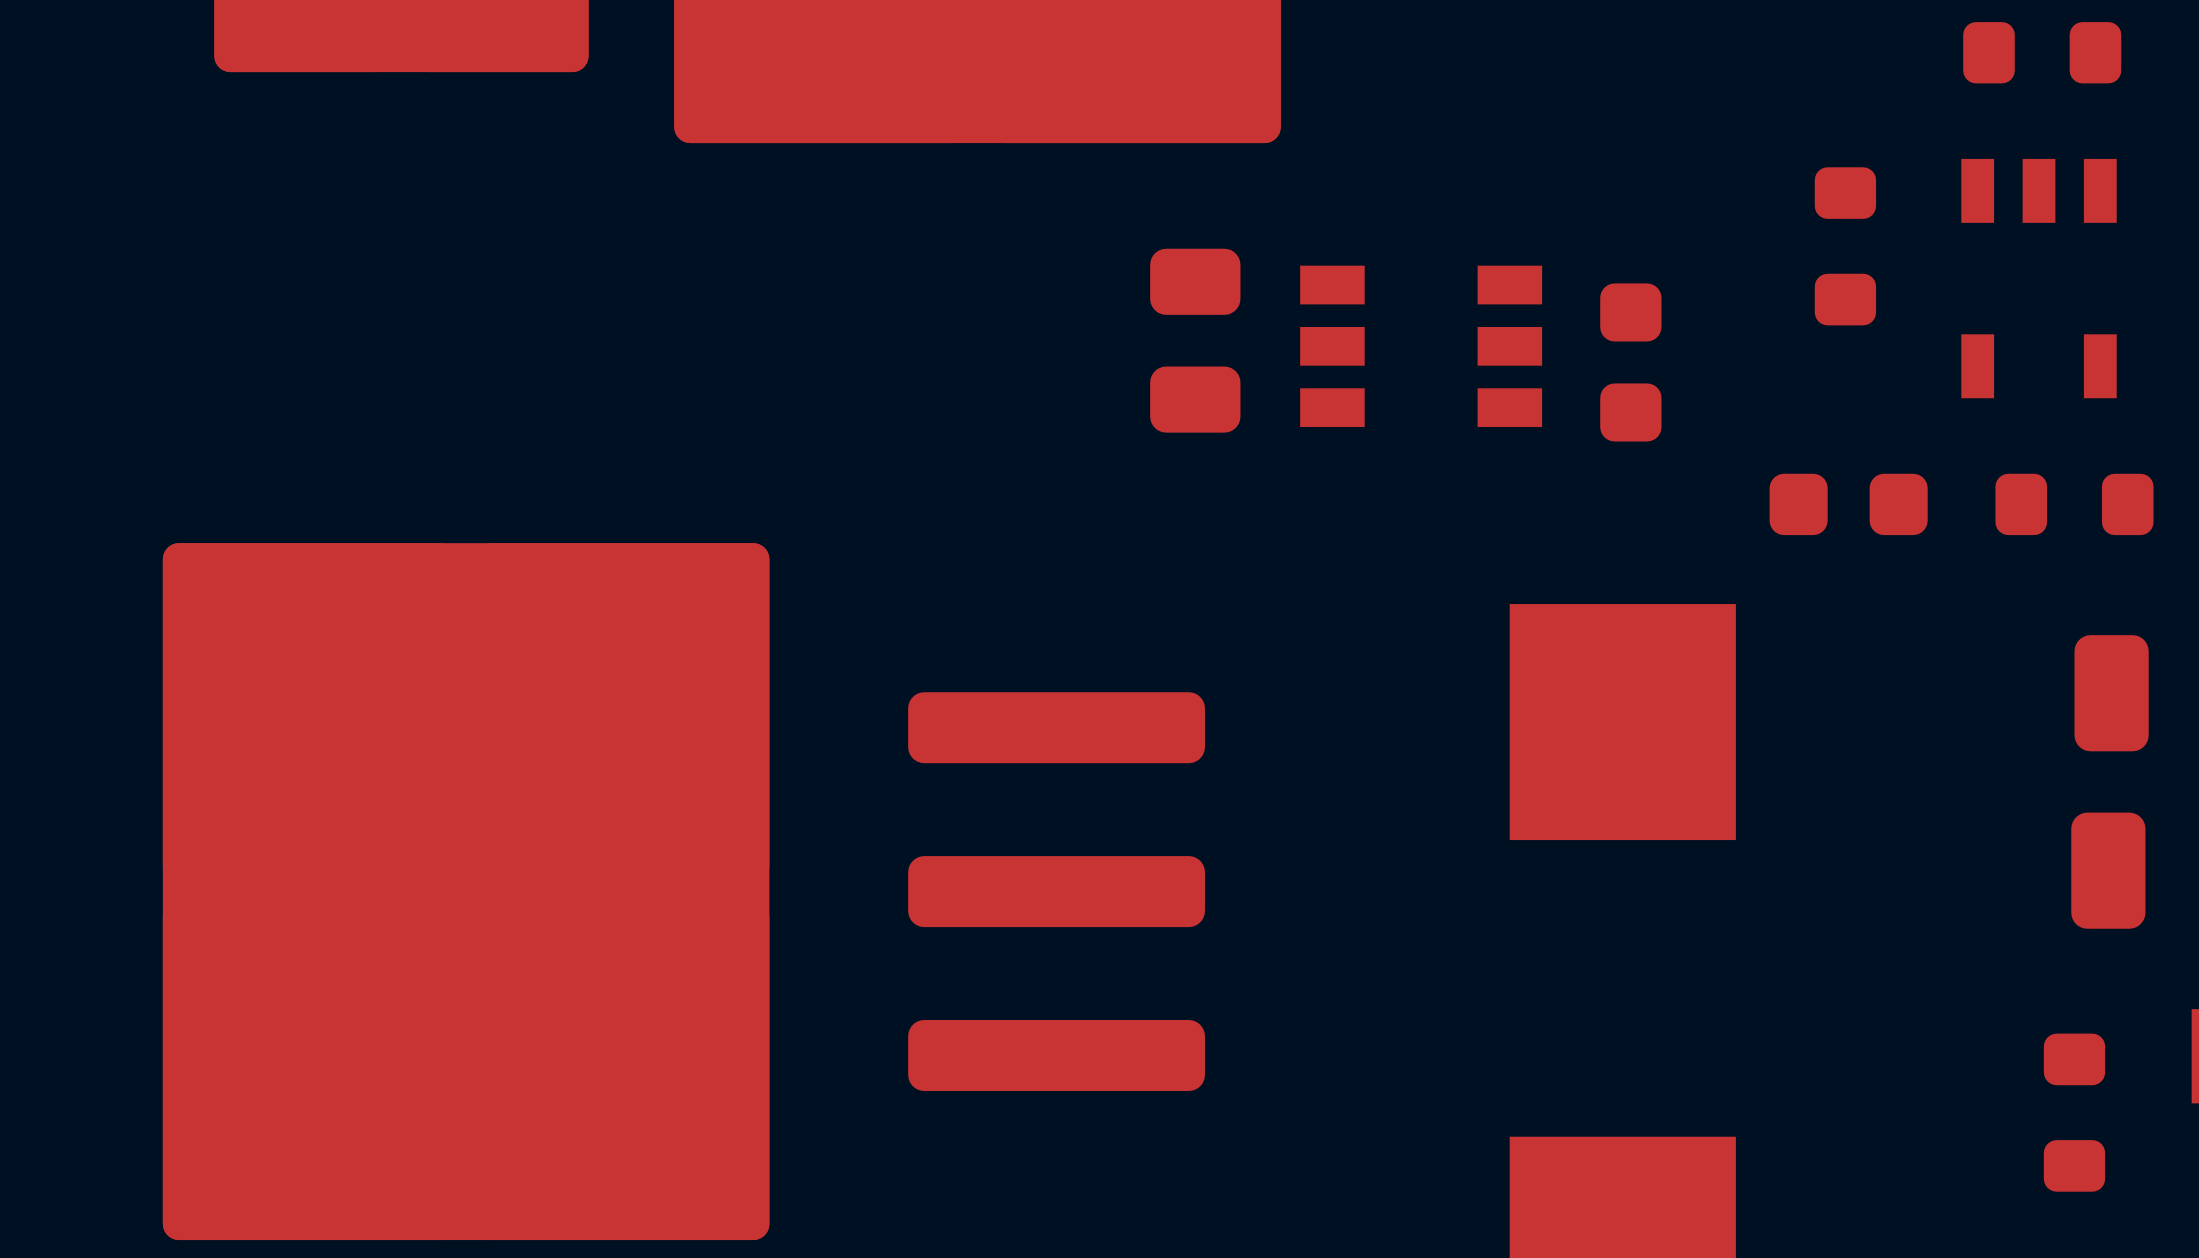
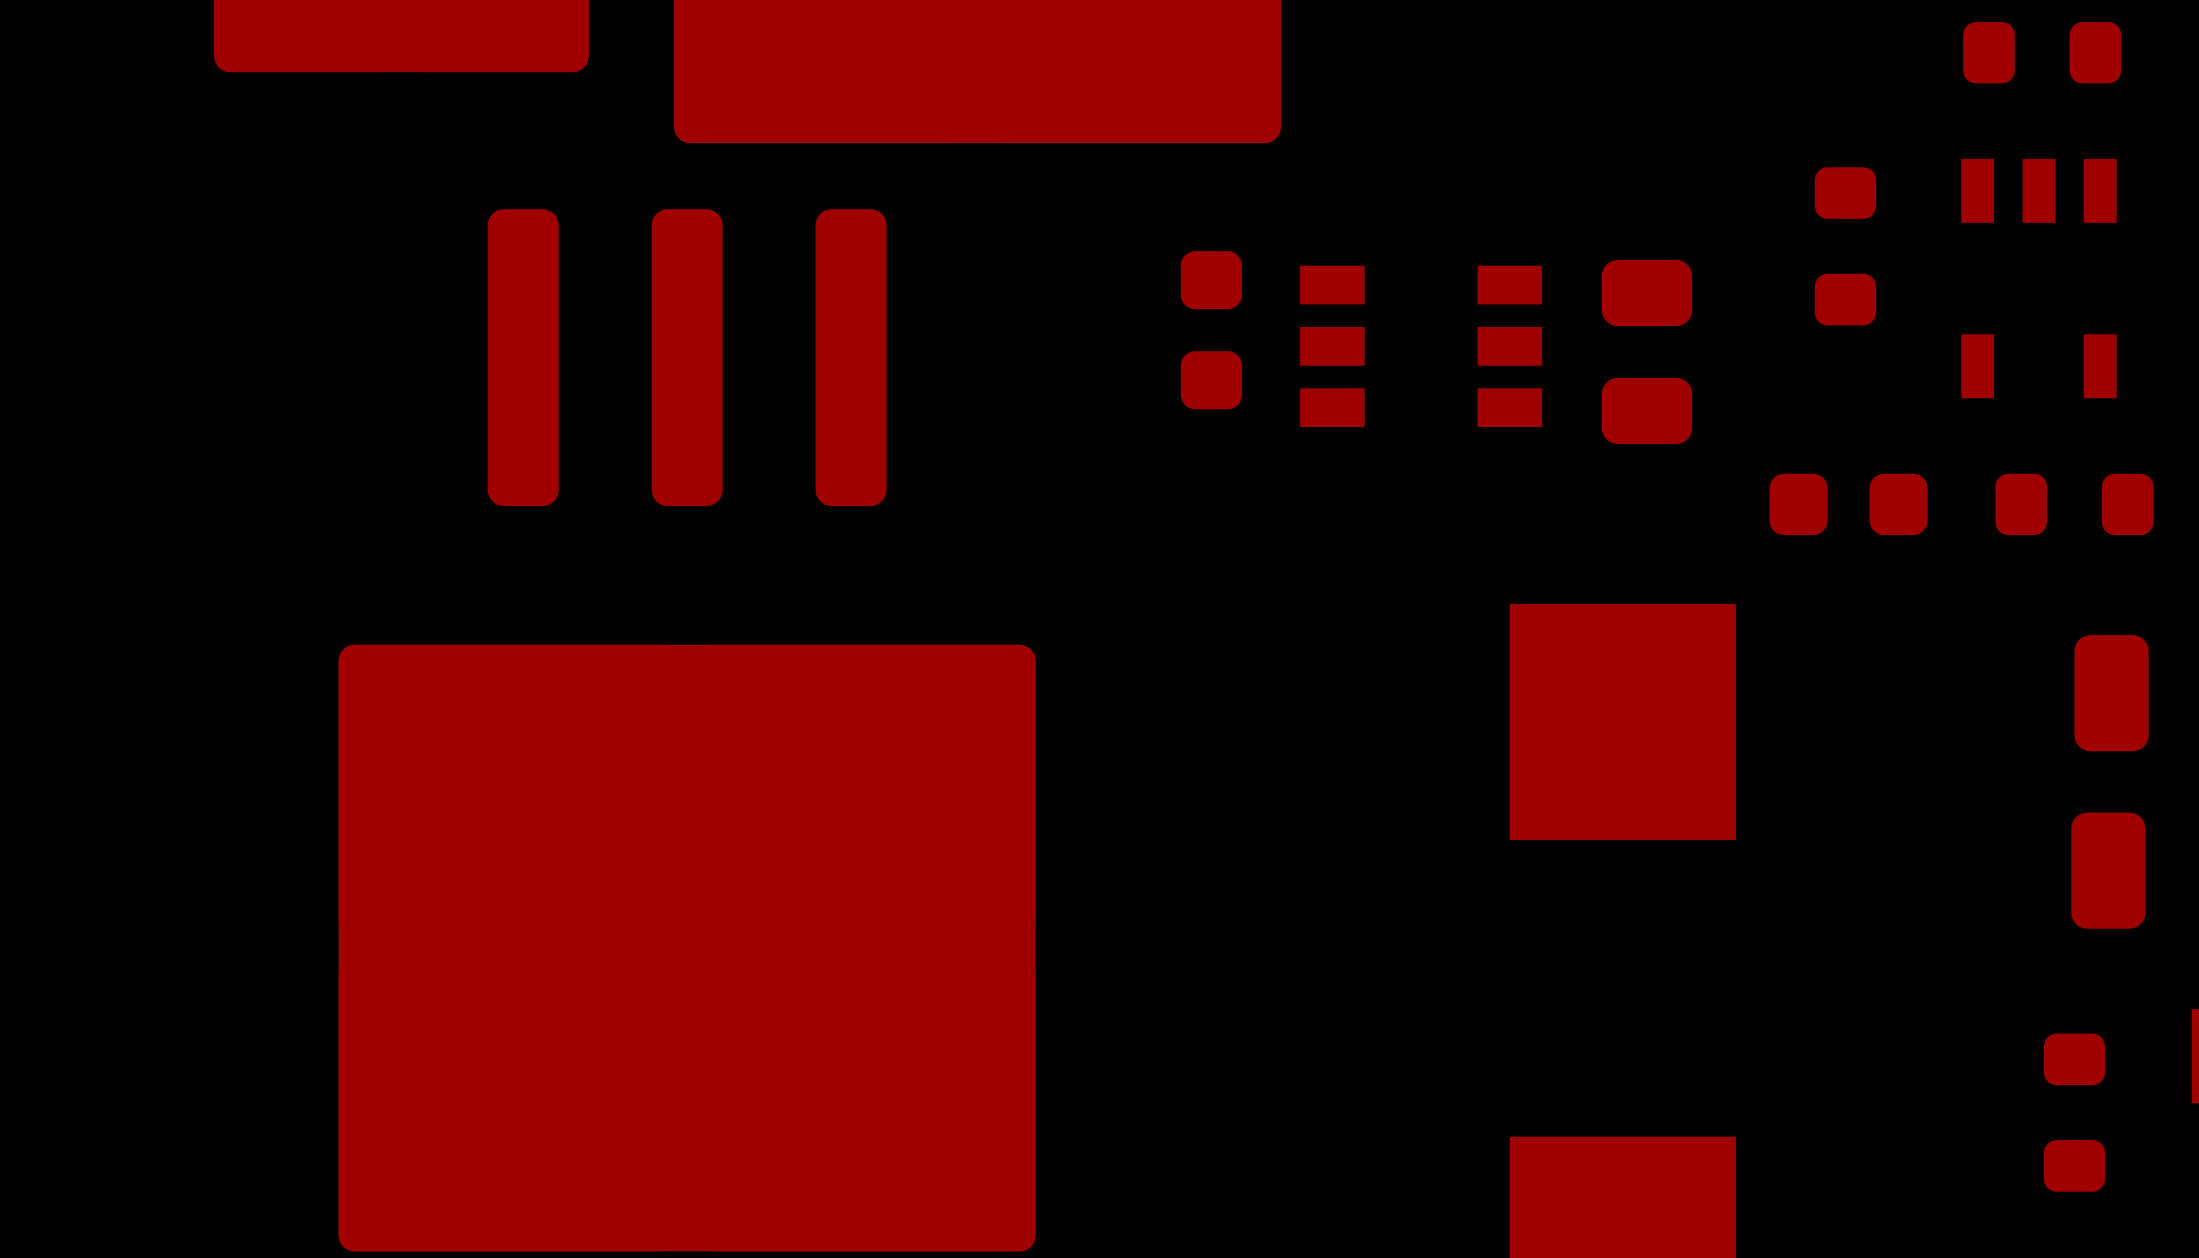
part footprint: [1150, 248, 1241, 433] -> [1180, 251, 1243, 410]
part footprint: [1600, 283, 1662, 442] -> [1601, 260, 1693, 444]
part rotation: 0° (683, 891) -> 90° counterclockwise (687, 730)

